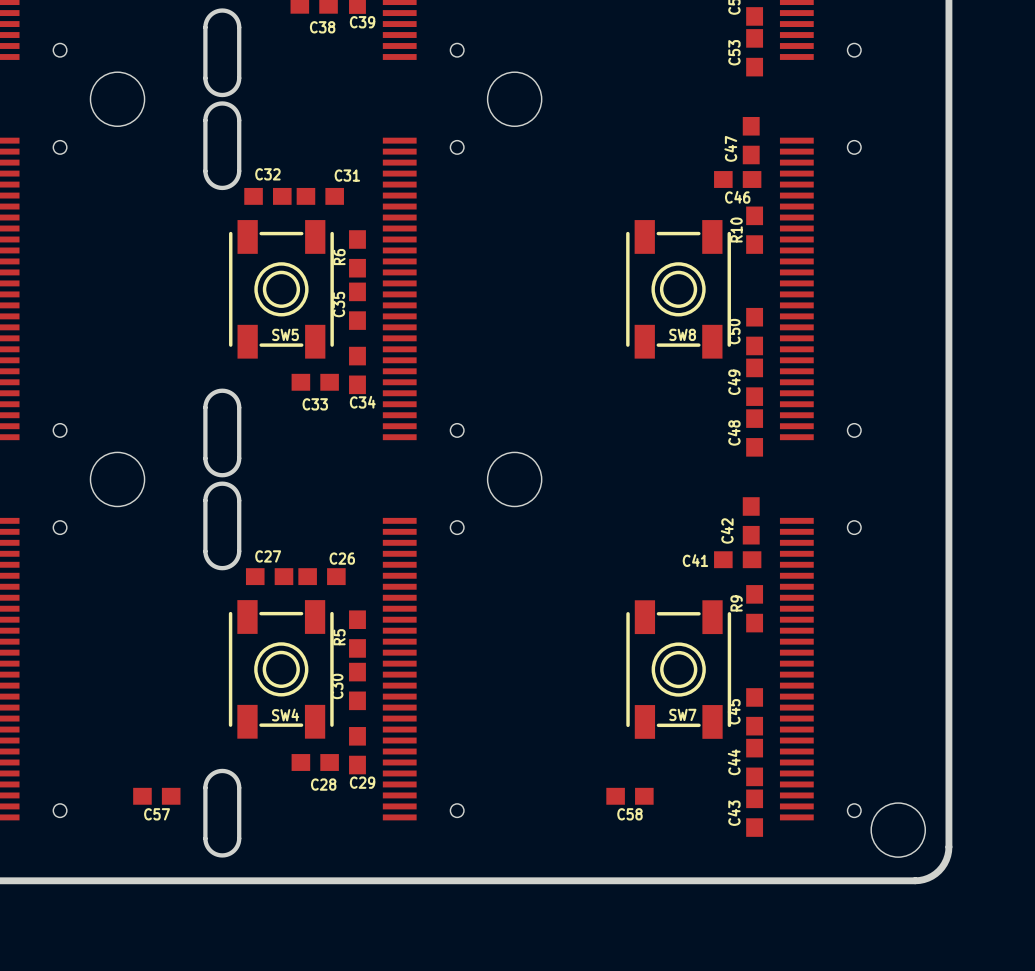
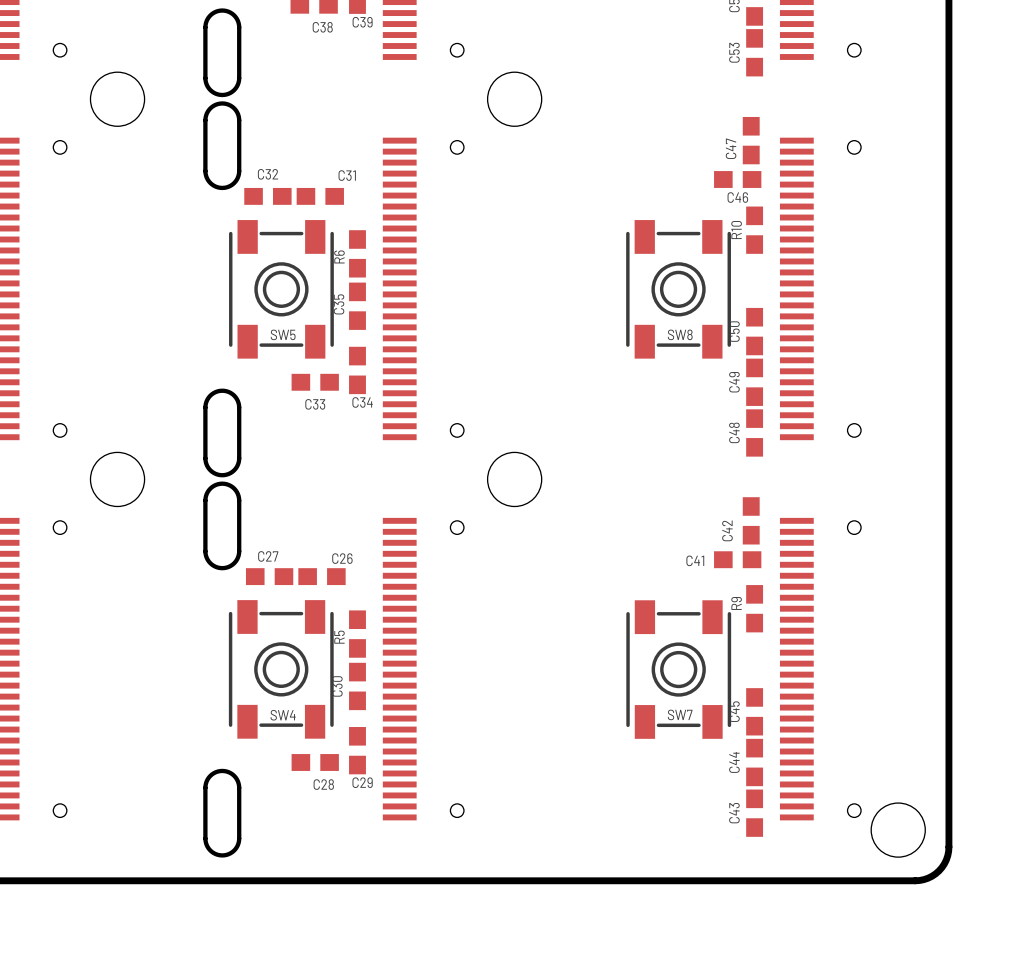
C57: (156, 796) -> none
C58: (629, 796) -> none

